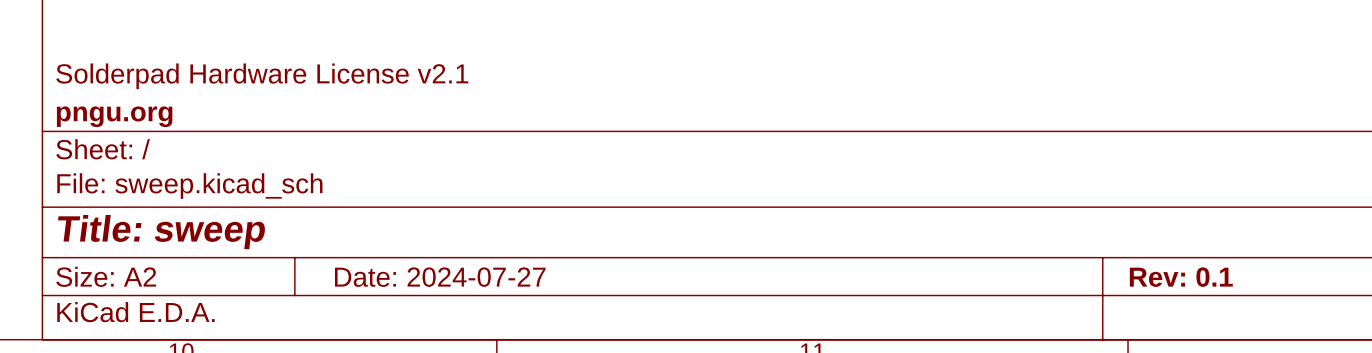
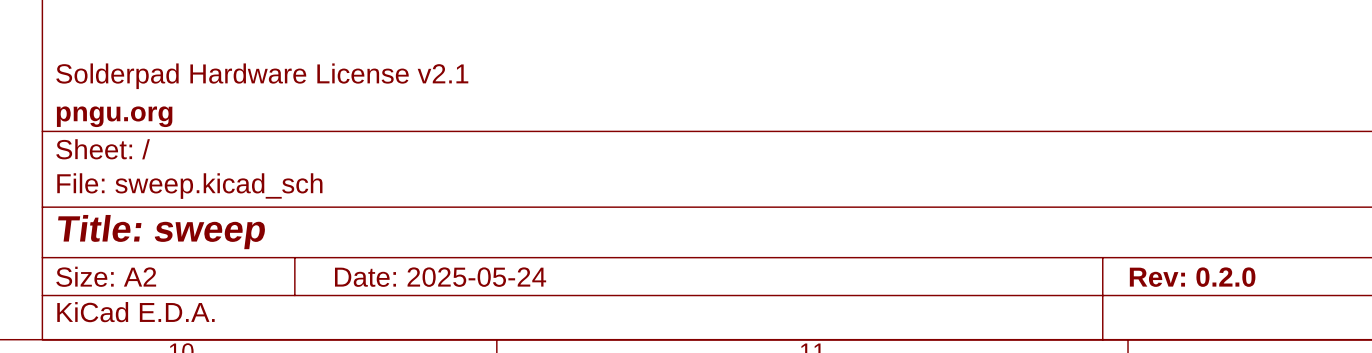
title block: Date: 2024-07-27 (440, 277) -> Date: 2025-05-24 (440, 277)
title block: Rev: 0.1 (1181, 277) -> Rev: 0.2.0 (1192, 277)

